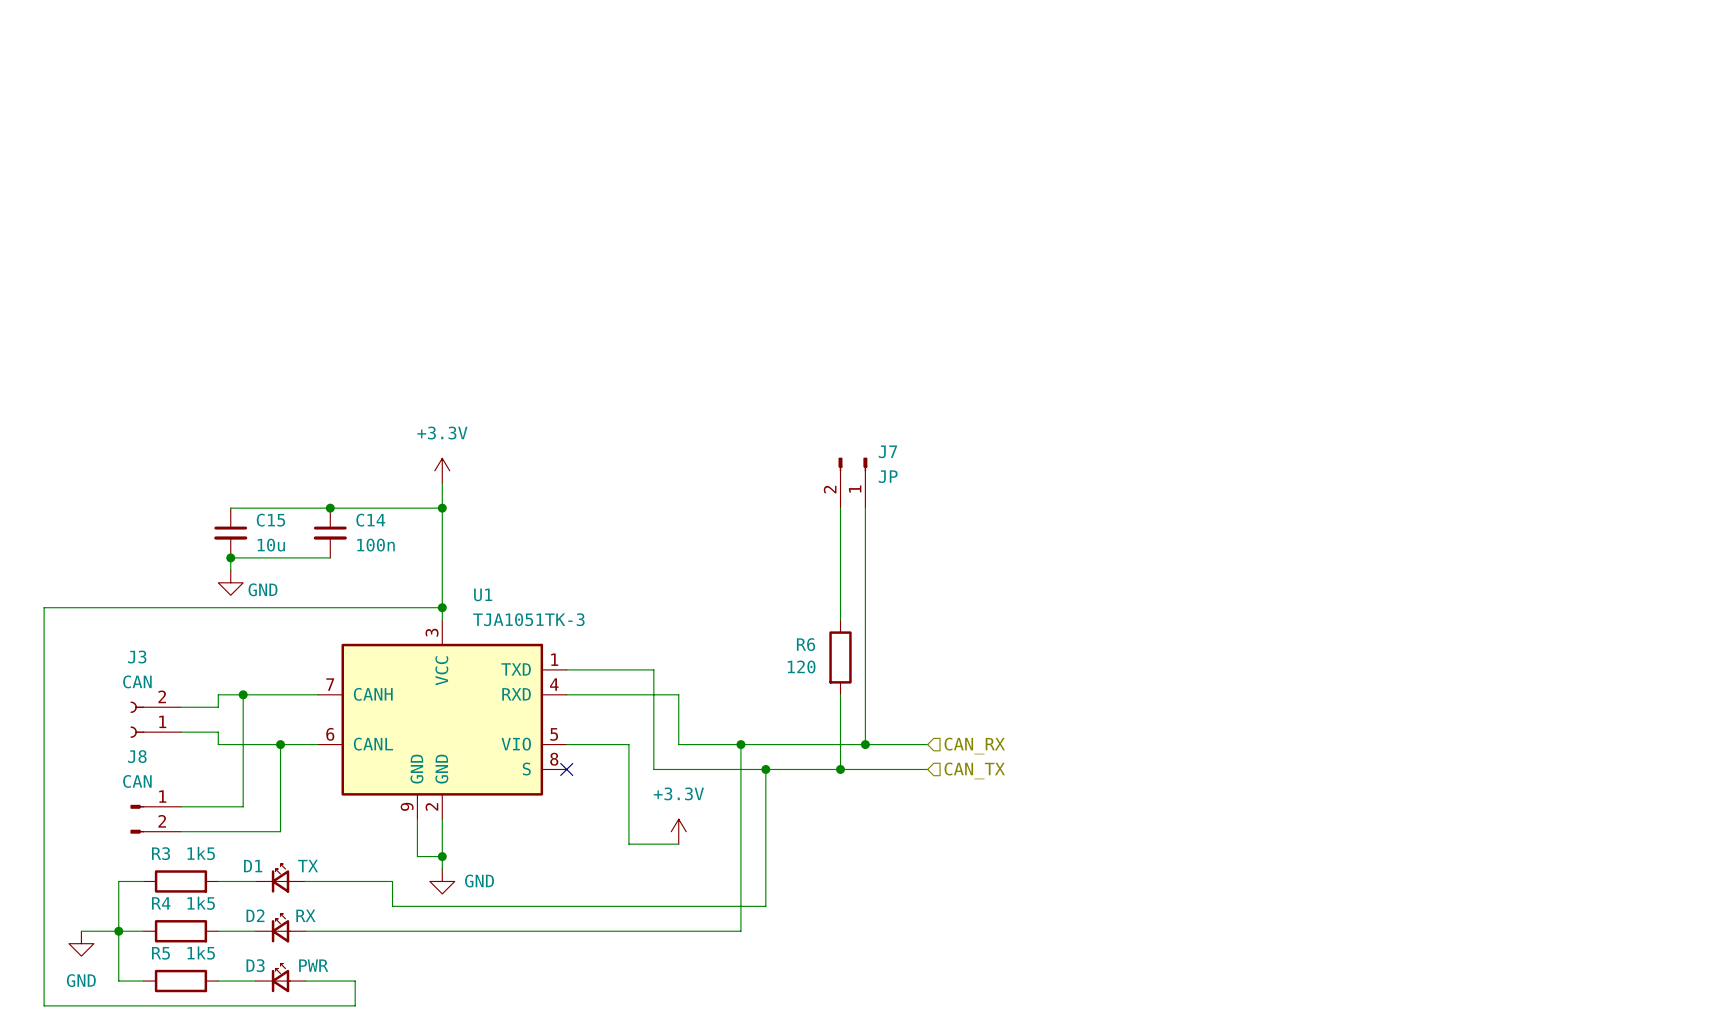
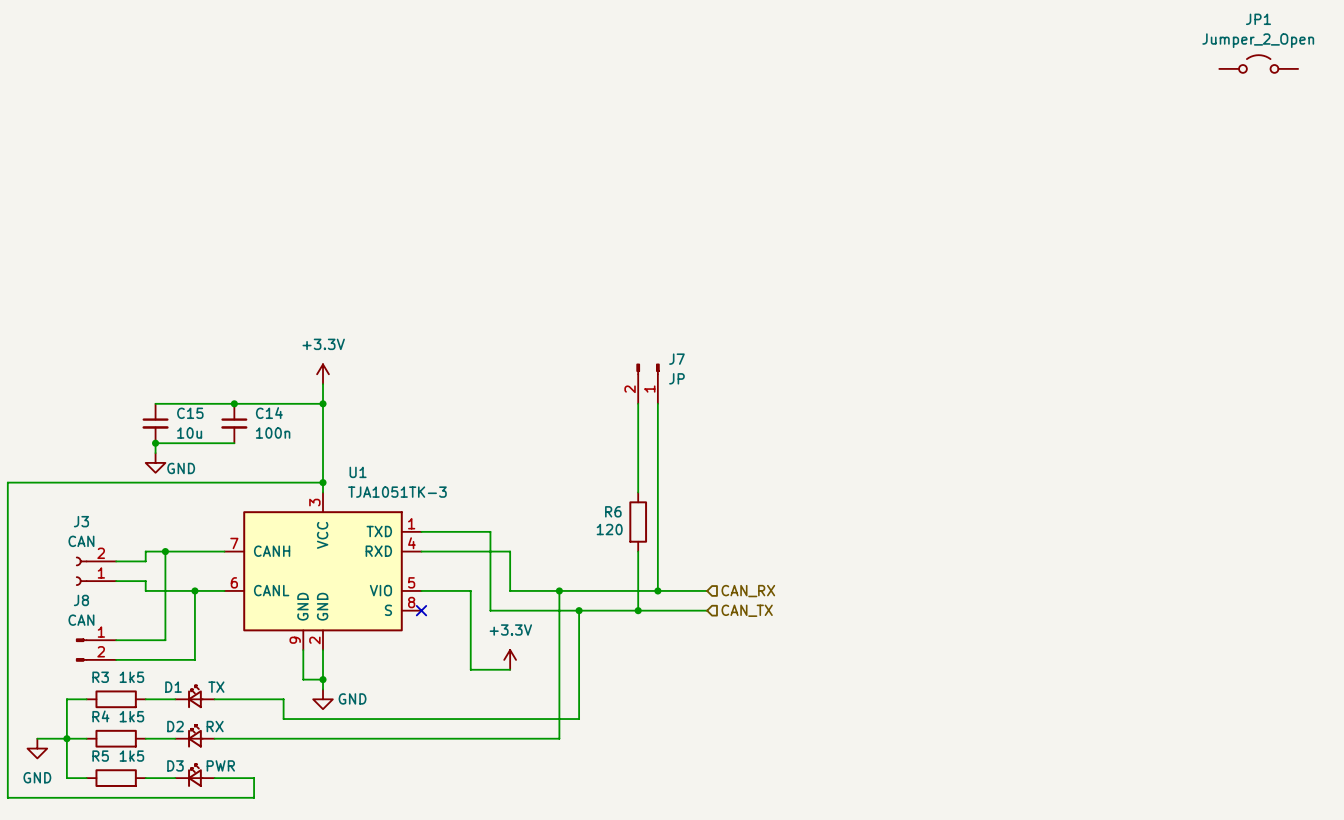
JP1: none -> Jumper_2_Open (1258, 64)

